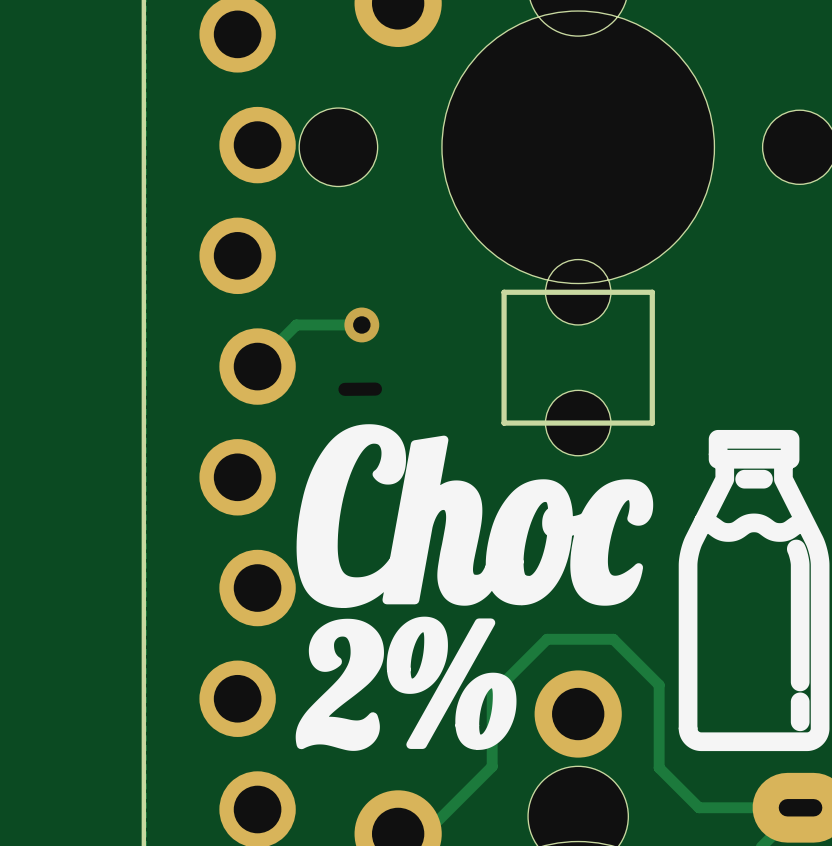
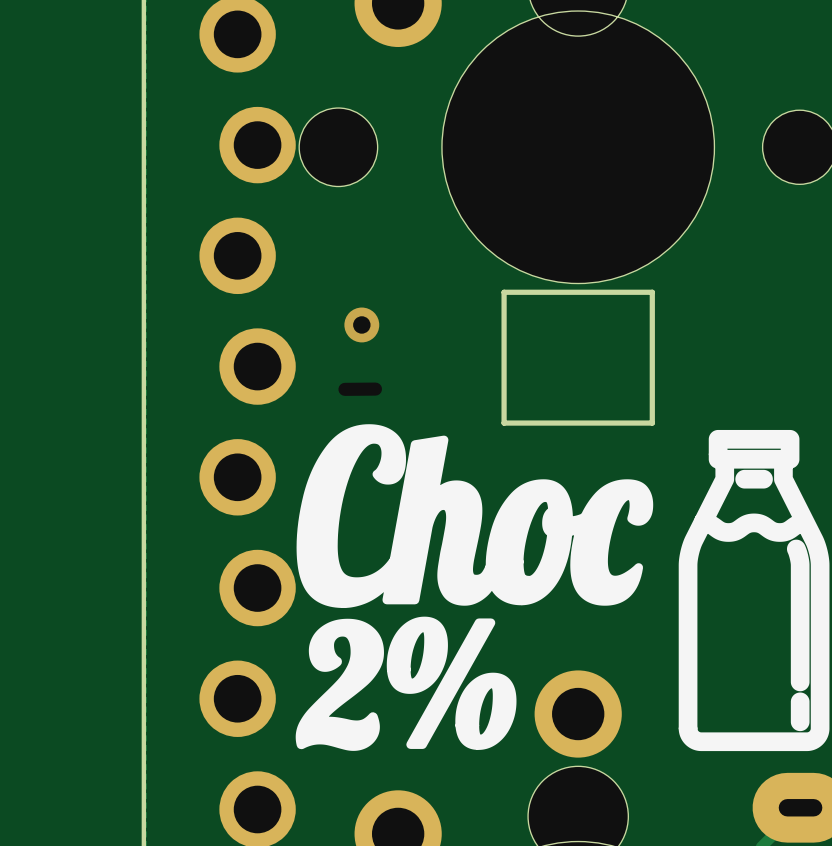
part footprint: [501, 259, 655, 456] -> [501, 289, 655, 426]
track: (361, 324) (296, 324) (257, 363) (257, 366) -> none
track: (800, 807) (699, 807) (659, 767) (659, 685) (613, 639) (547, 639) (492, 694) (492, 766) (424, 833) (398, 833) -> none

